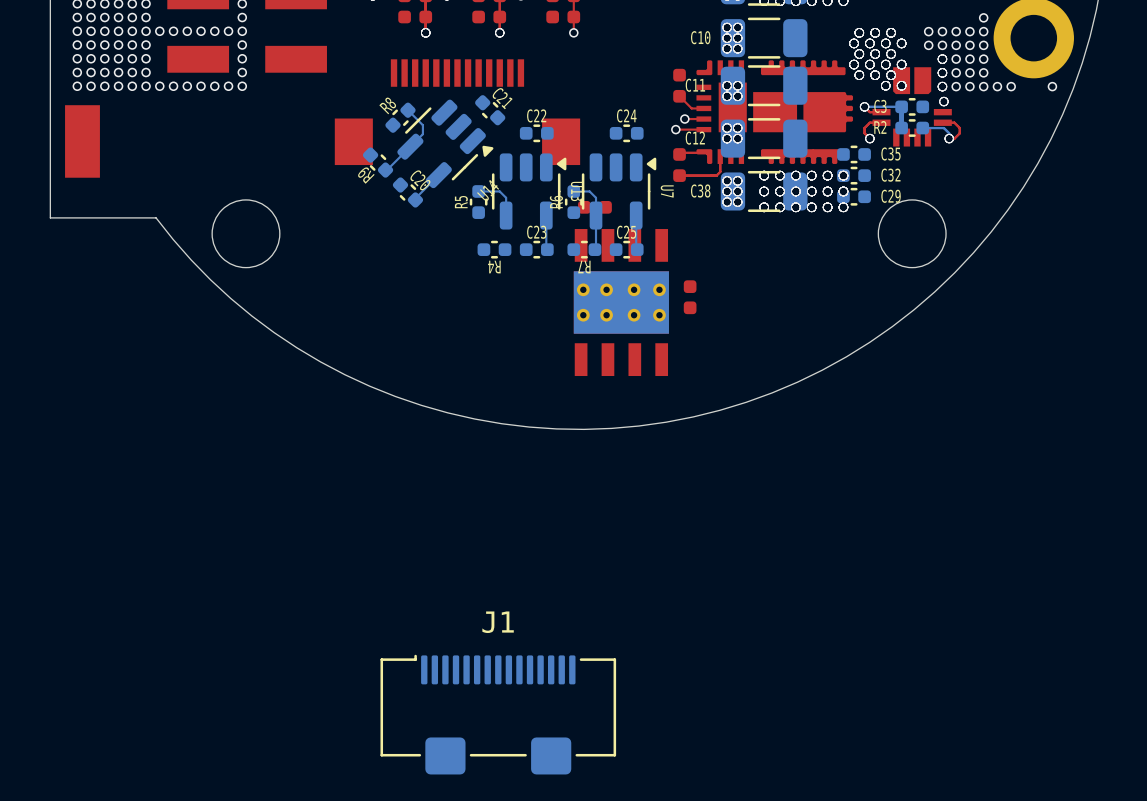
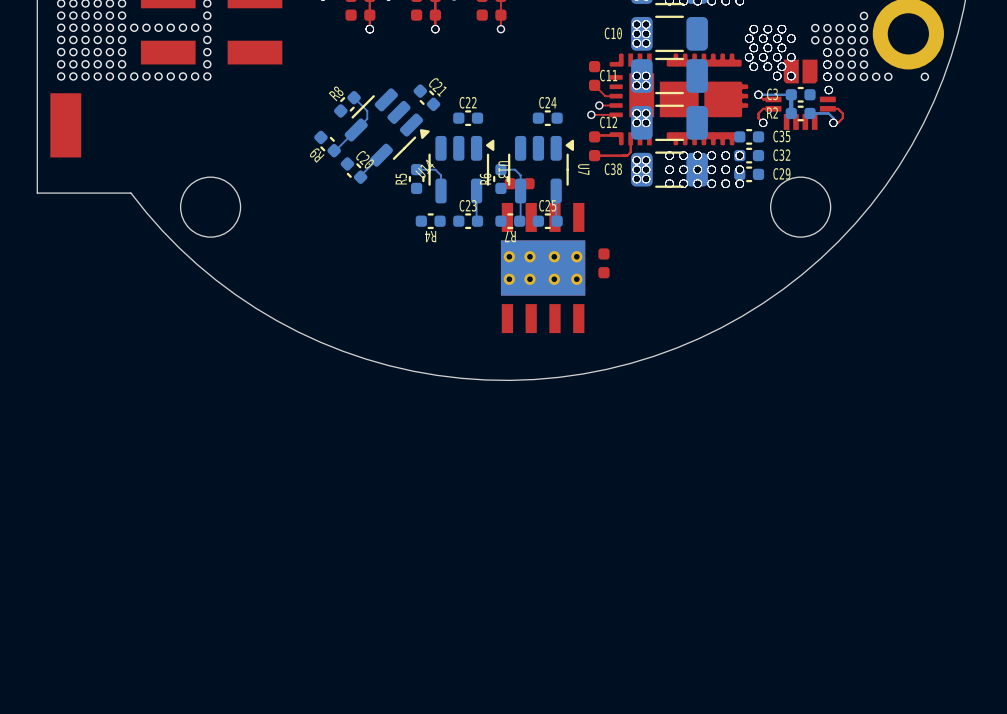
part: (457, 112) -> none
J1: (498, 714) -> none

